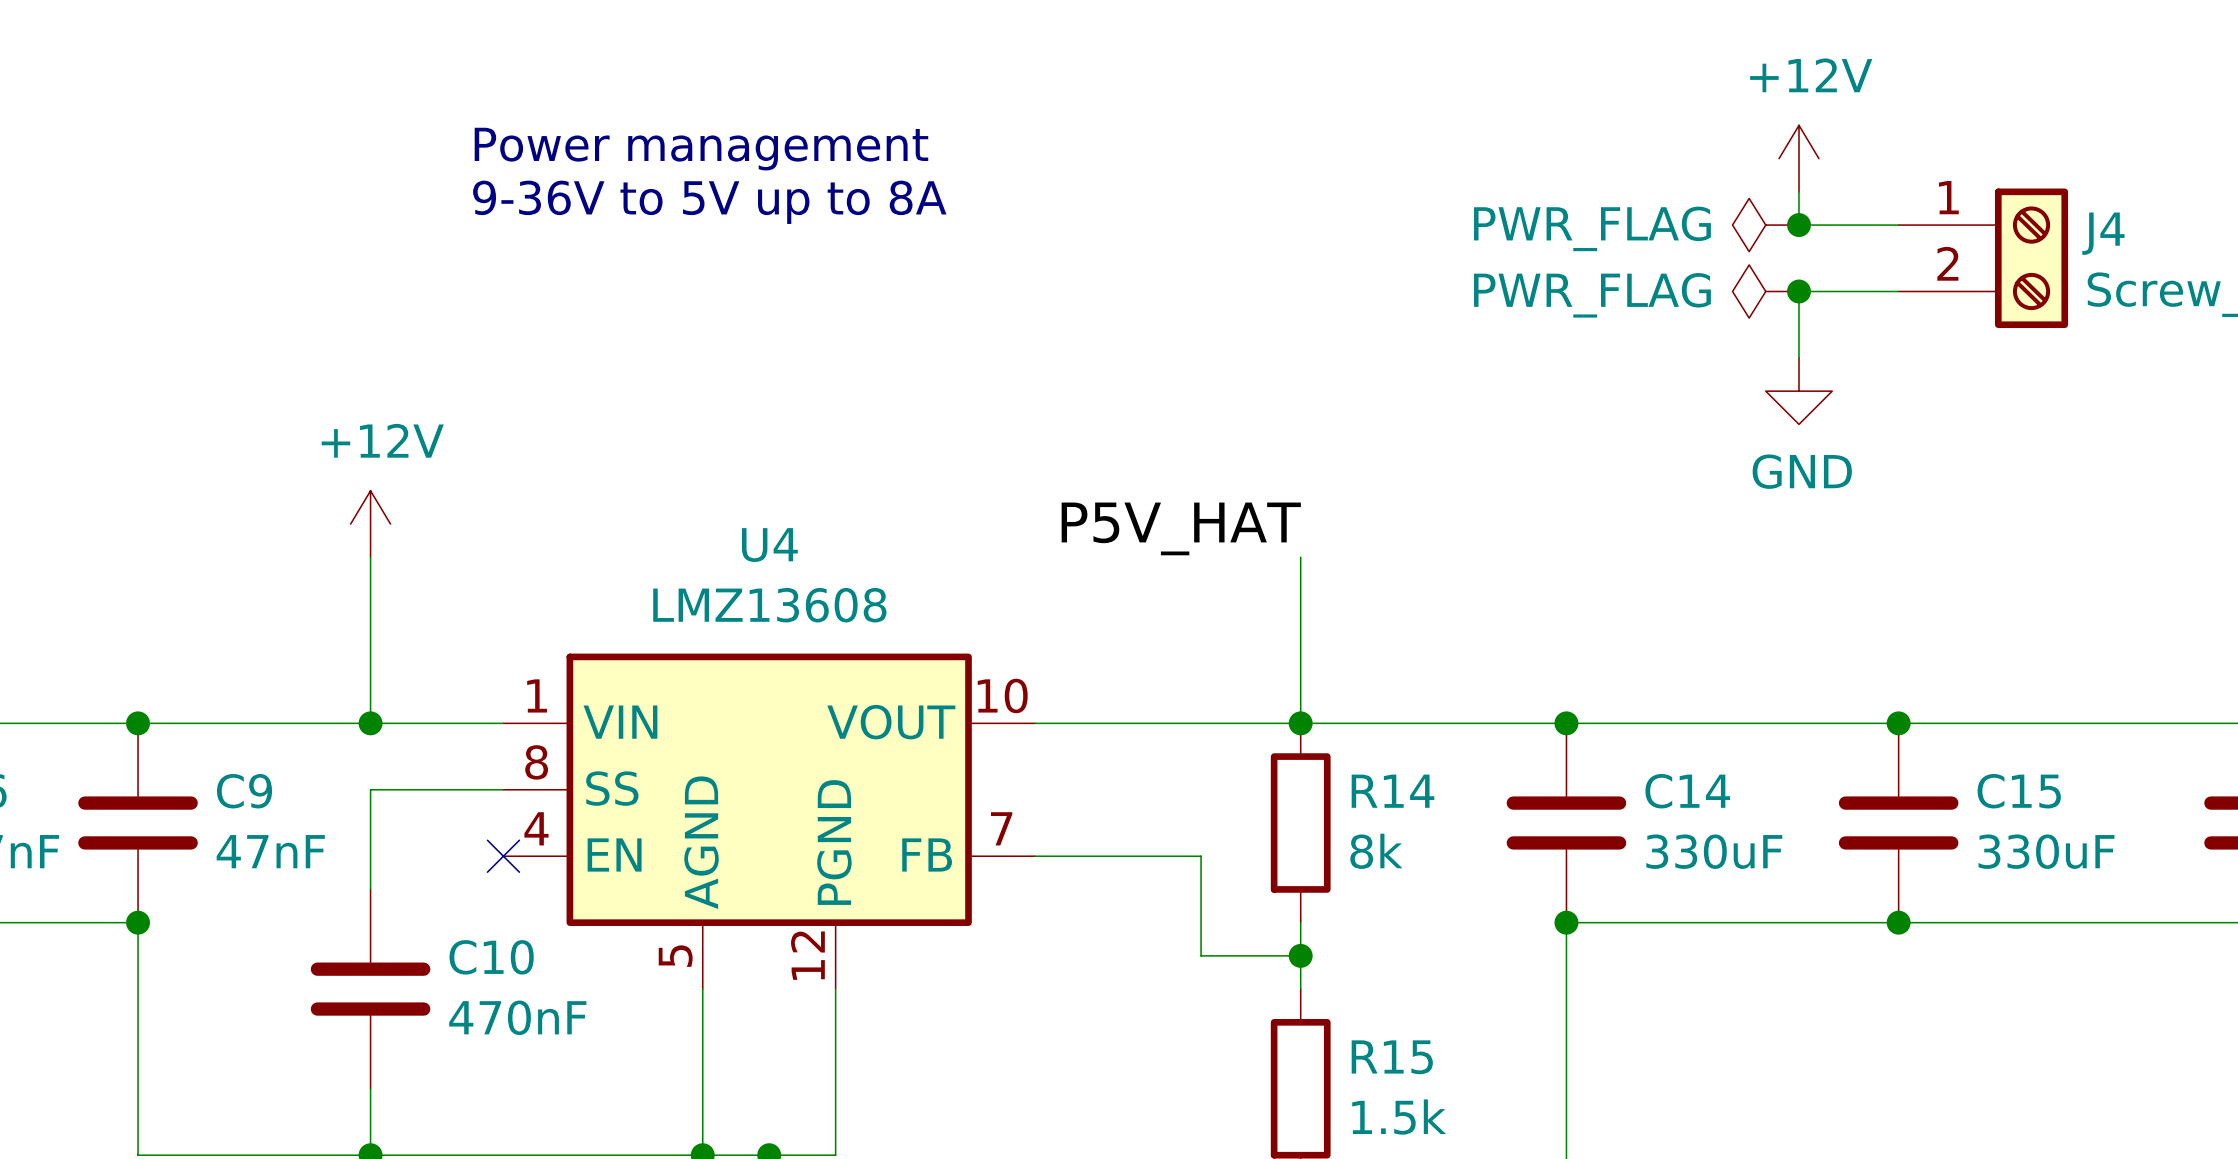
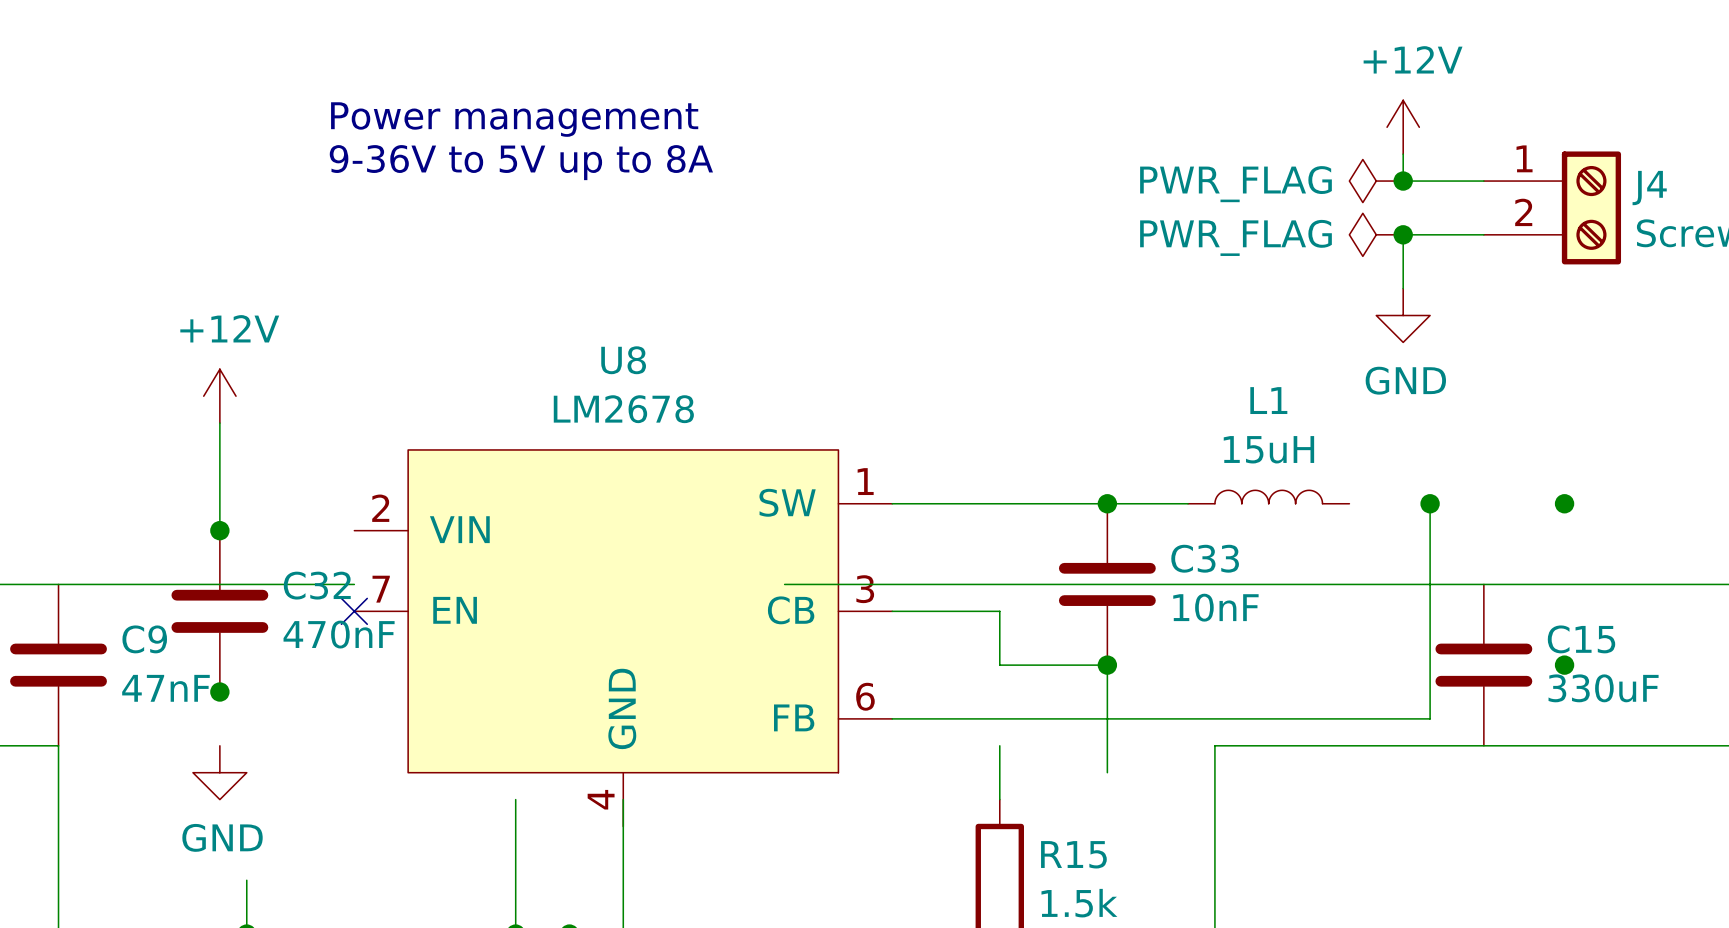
wire: none -> (219, 423) (219, 530)
power symbol position: +12V (370, 524) -> +12V (219, 396)
label: P5V_HAT (1181, 528) -> none
wire: (370, 557) (370, 723) -> none
wire: (1300, 557) (1300, 723) -> none
L1: none -> 15uH (1268, 497)
wire: none -> (892, 503) (1188, 503)
junction: none -> (1107, 503)
wire: none -> (1430, 503) (1430, 718) (892, 718)
junction: none -> (1430, 503)
junction: none -> (1564, 503)
junction: none -> (219, 530)
junction: (138, 723) -> none
junction: (370, 723) -> none
junction: (1300, 723) -> none
C33: none -> 10nF (1107, 584)
junction: (1566, 723) -> none
junction: (1898, 723) -> none
C32: none -> 470nF (219, 611)
wire: none -> (892, 611) (999, 611) (999, 665) (1107, 665) (1107, 772)
wire: (503, 789) (370, 789) (370, 889) -> none
U8: none -> LM2678 (623, 638)
U4: LMZ13608 (769, 821) -> none
R14: 8k (1300, 823) -> none
junction: none -> (1107, 665)
C14: 330uF (1566, 823) -> none
junction: none -> (1564, 665)
junction: none -> (219, 692)
no-connect mark position: (503, 856) -> (354, 611)
wire: (1034, 856) (1201, 856) (1201, 955) (1300, 955) -> none
junction: (138, 922) -> none
junction: (1566, 922) -> none
junction: (1898, 922) -> none
power symbol: none -> GND (219, 772)
junction: (1300, 955) -> none
C10: 470nF (370, 989) -> none

